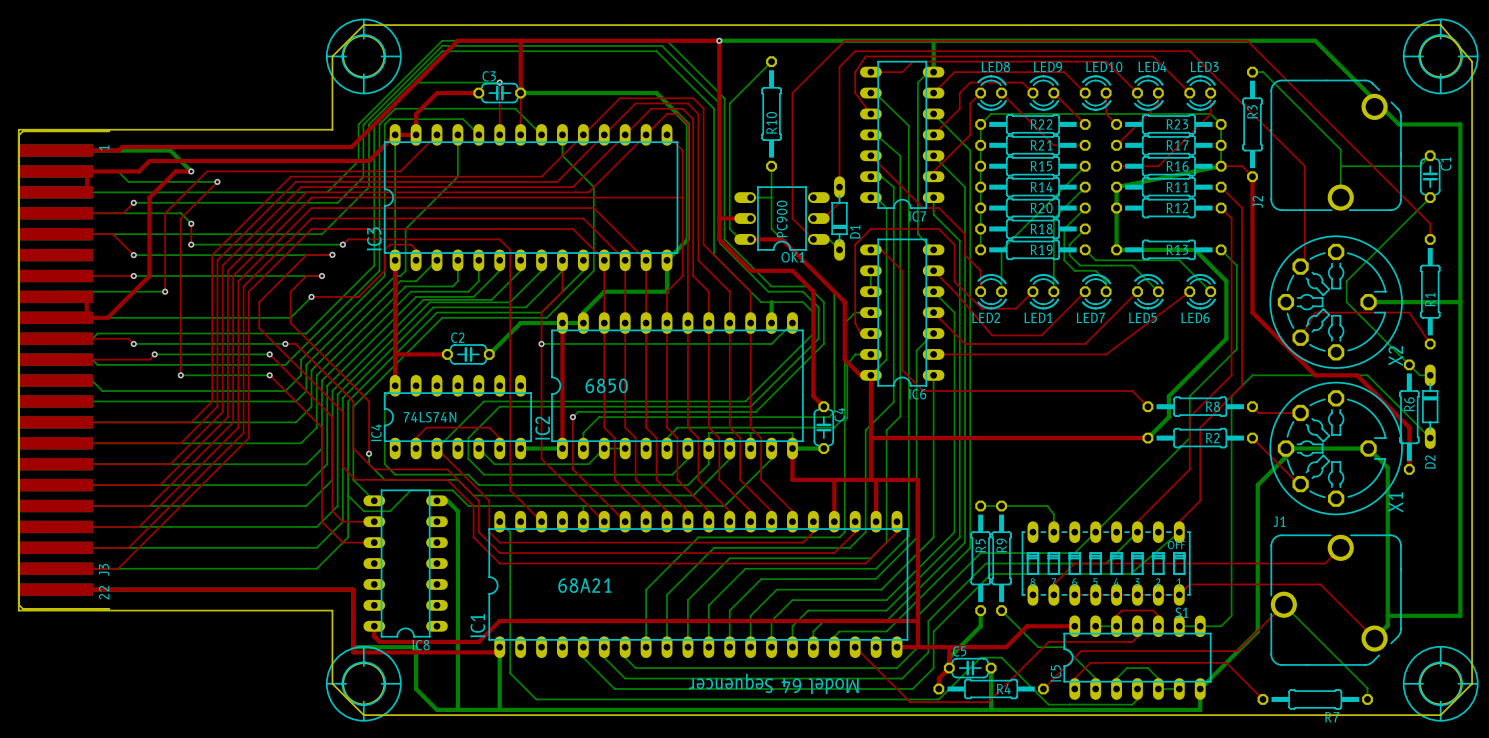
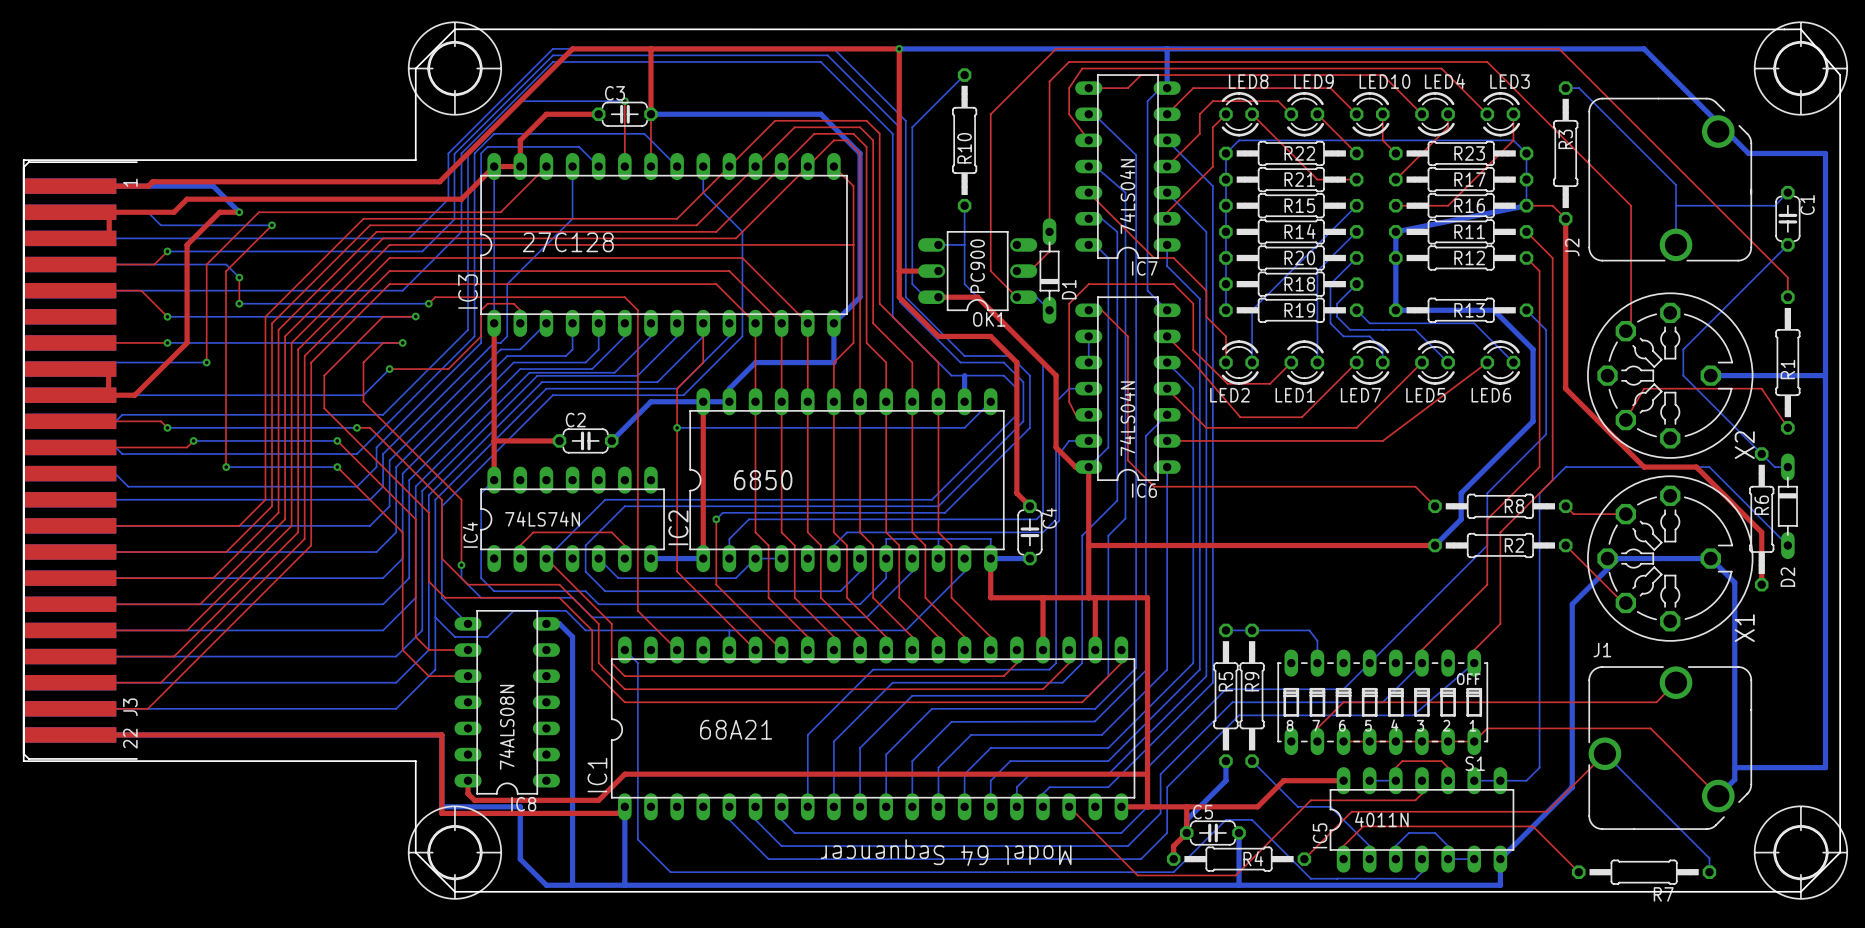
IC7 value: none -> 74LS04N (1127, 196)
text: none -> 27C128 (568, 242)
IC6 value: none -> 74LS04N (1127, 418)
IC8 value: none -> 74ALS08N (506, 727)
IC5 value: none -> 4011N (1381, 819)

